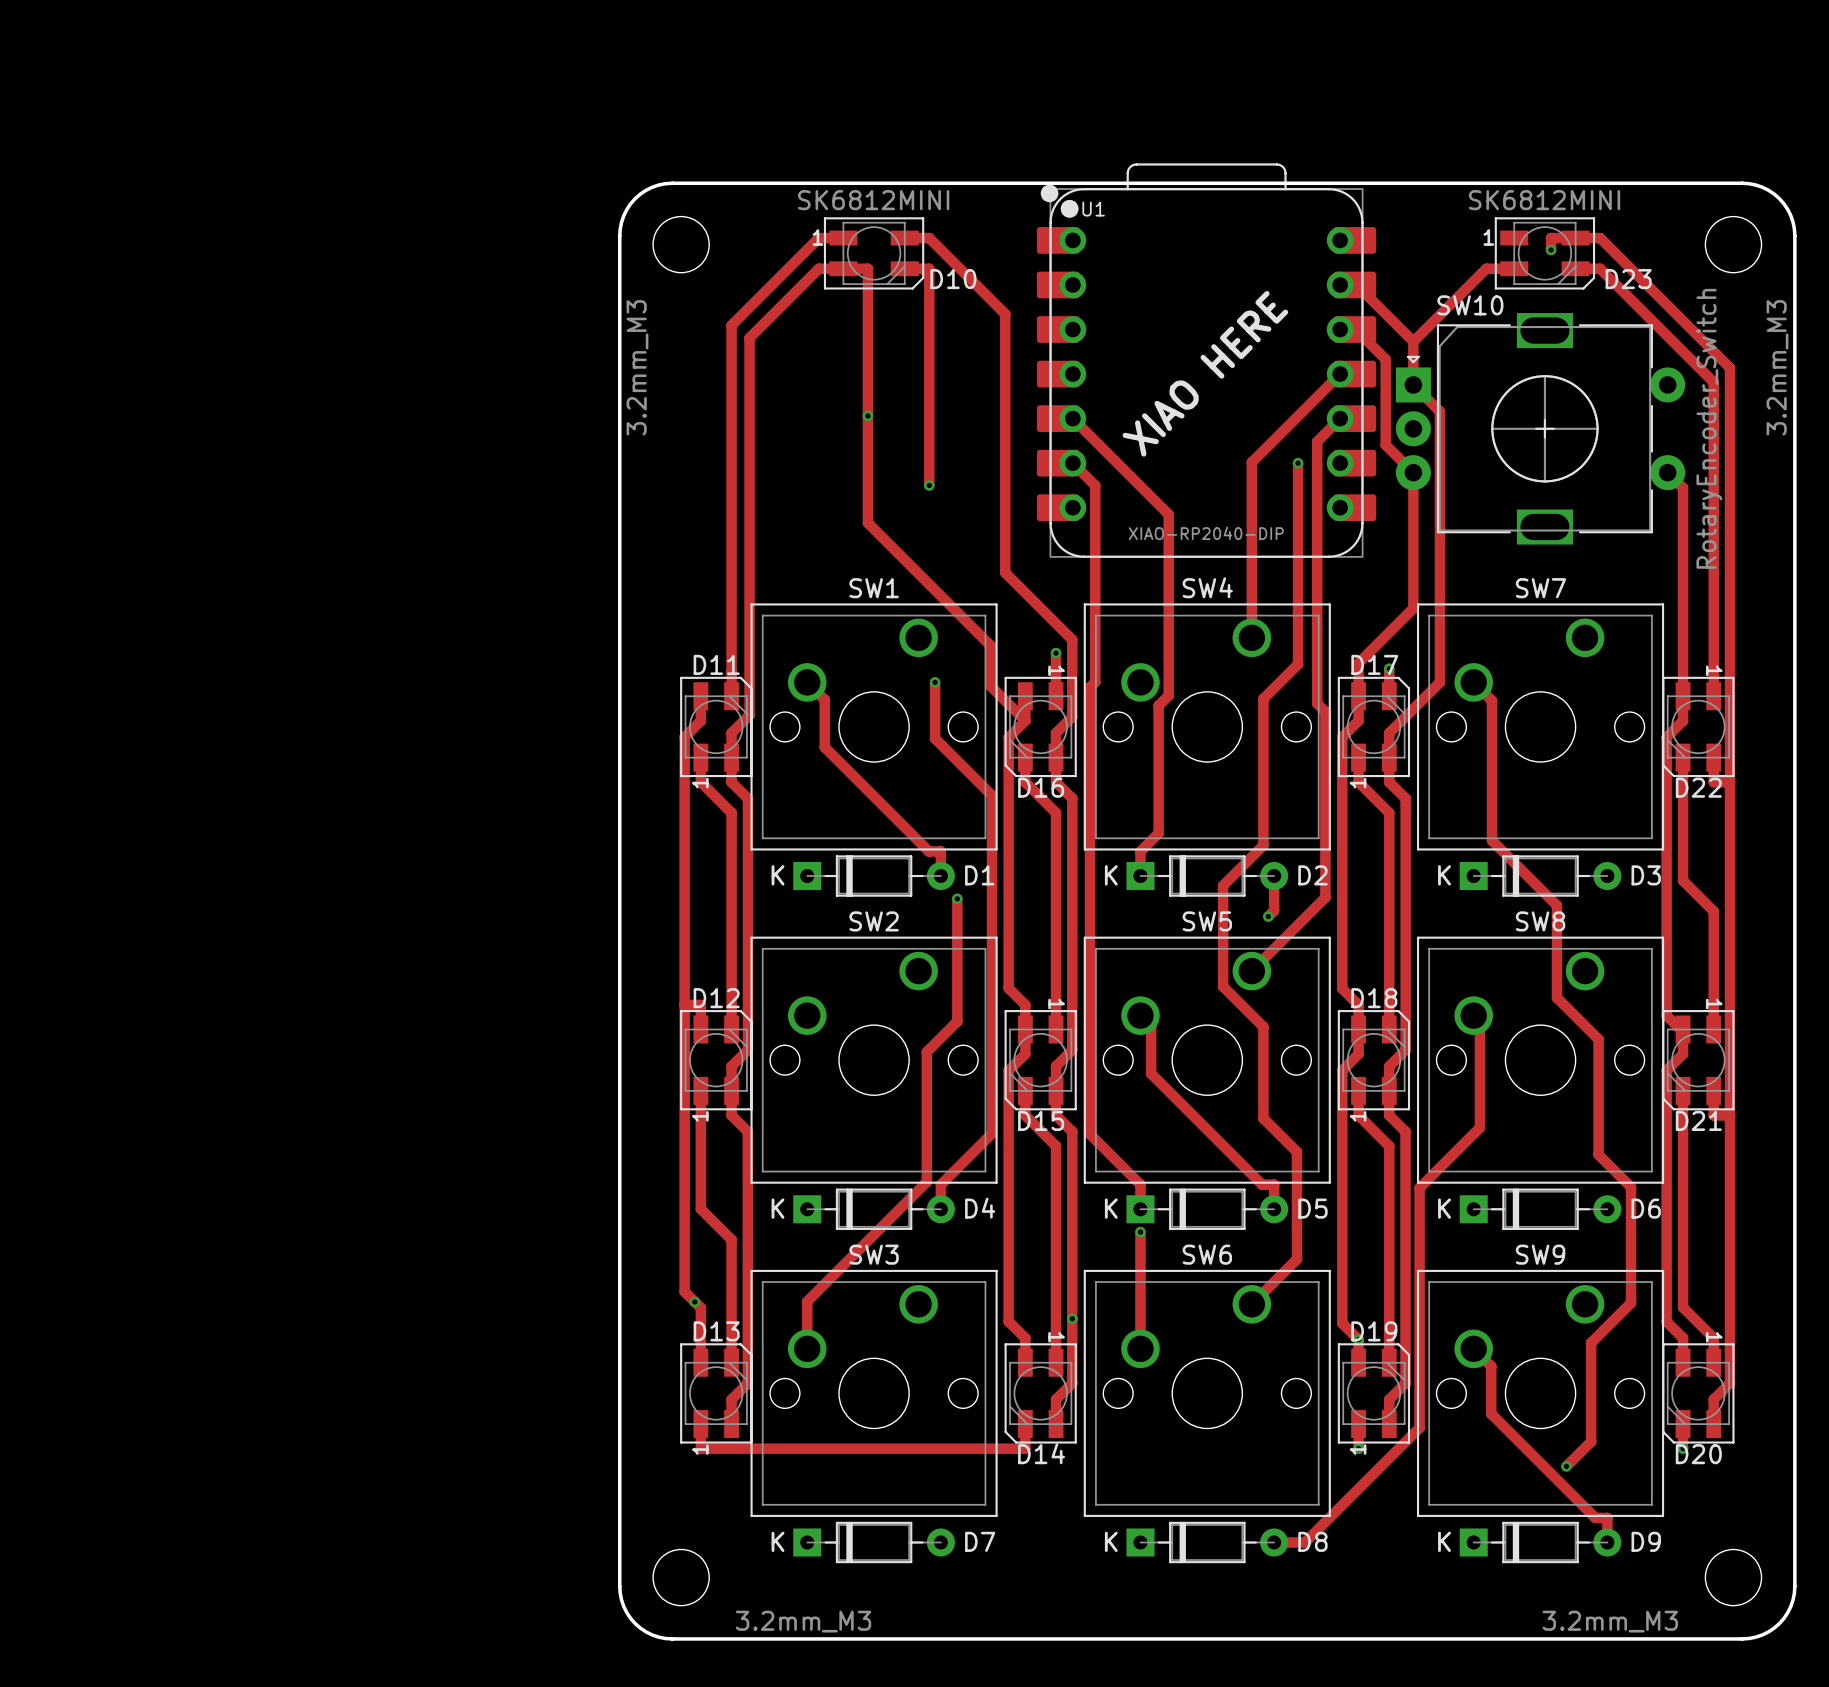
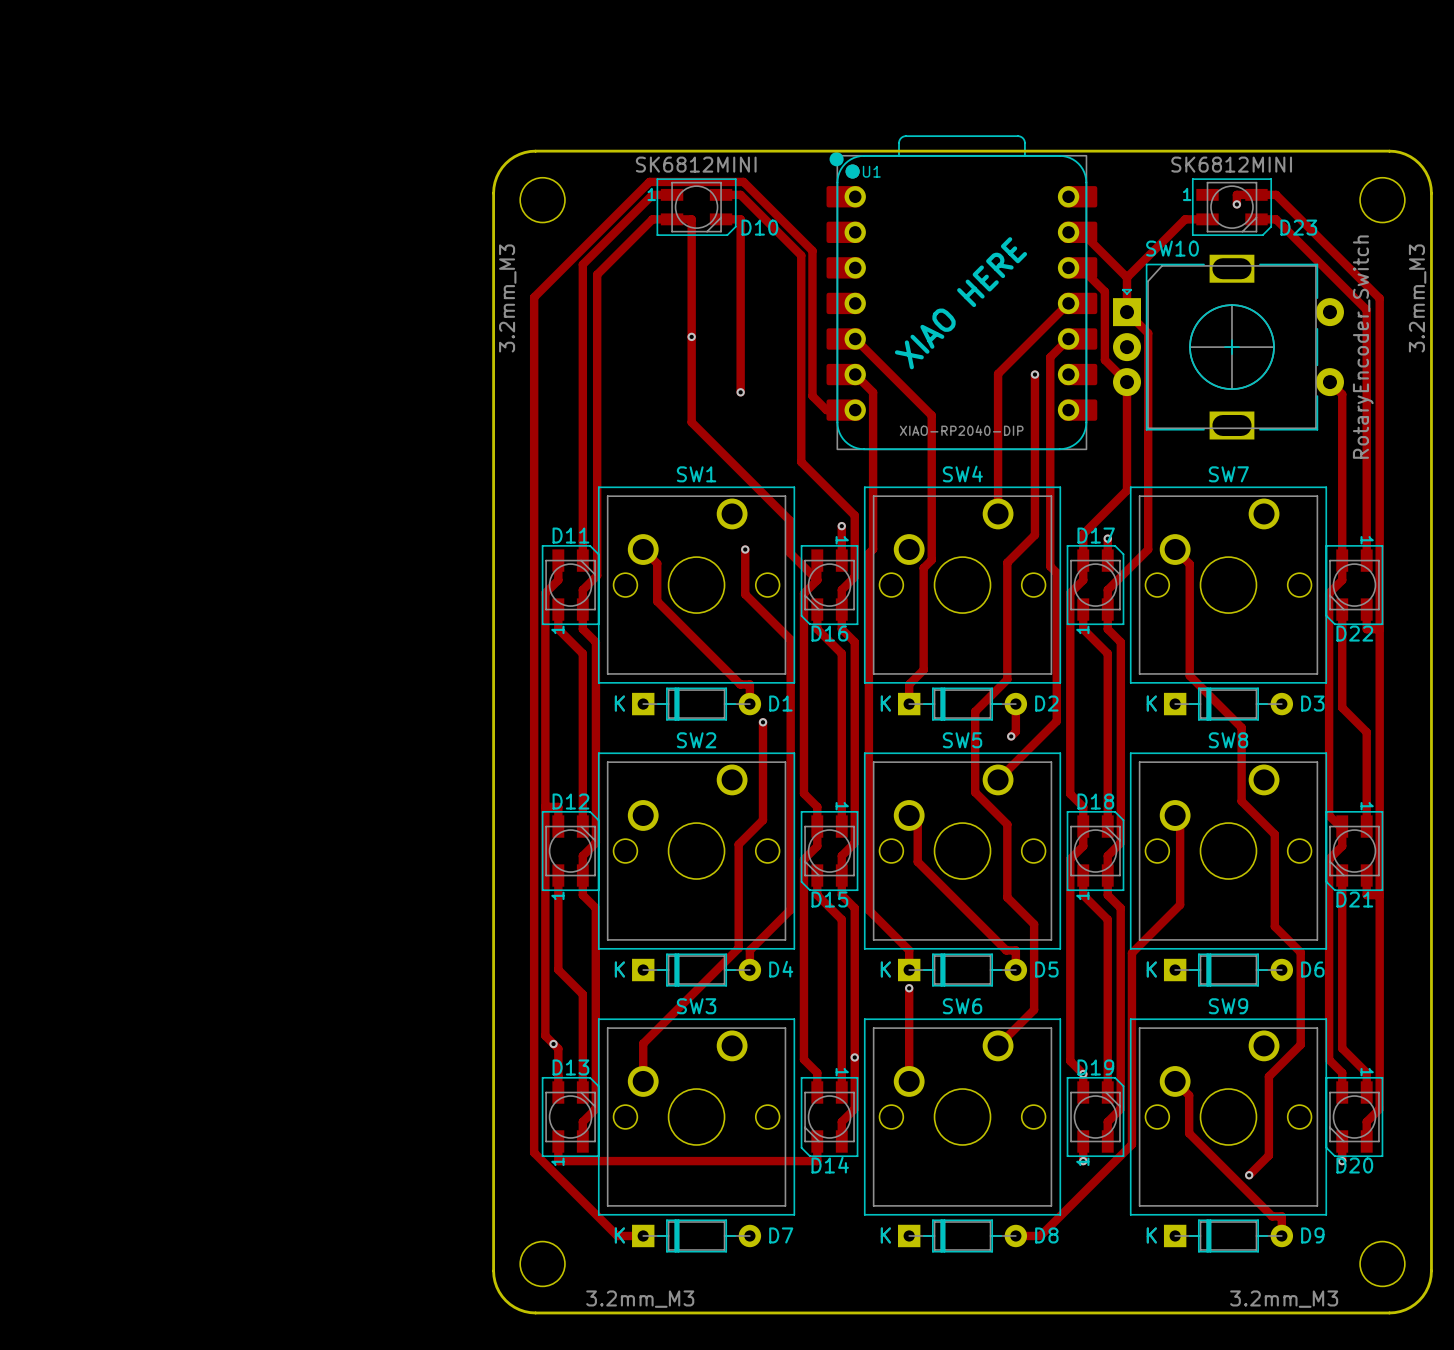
track: none -> (843, 410) (826, 410) (812, 396) (812, 250) (743, 181) (649, 181) (534, 297) (534, 1152) (617, 1235) (643, 1235)

